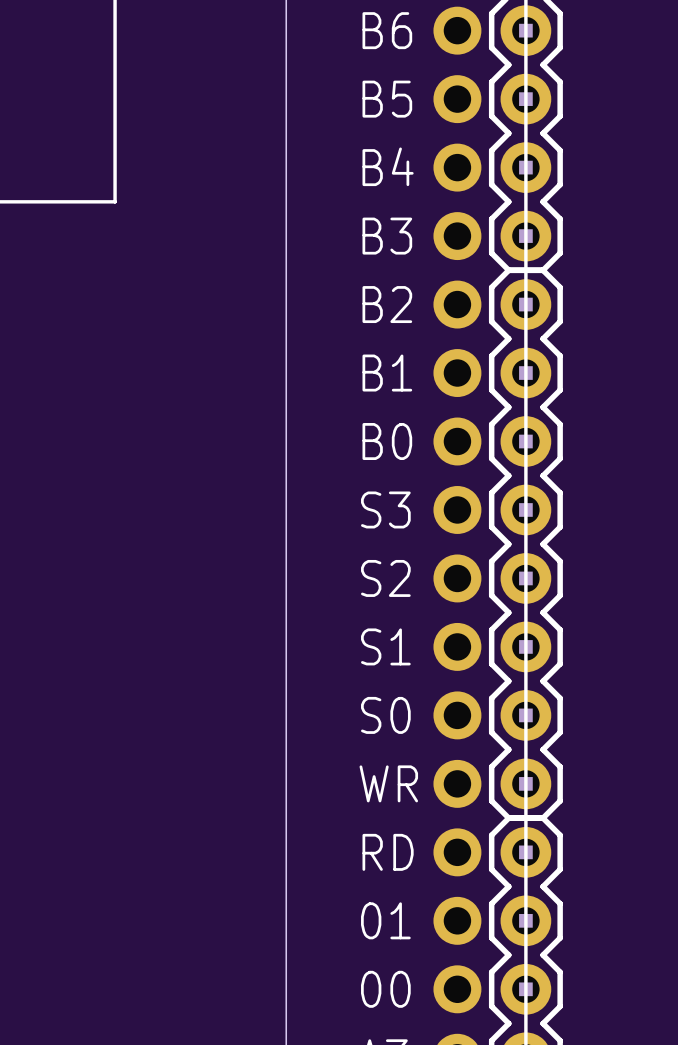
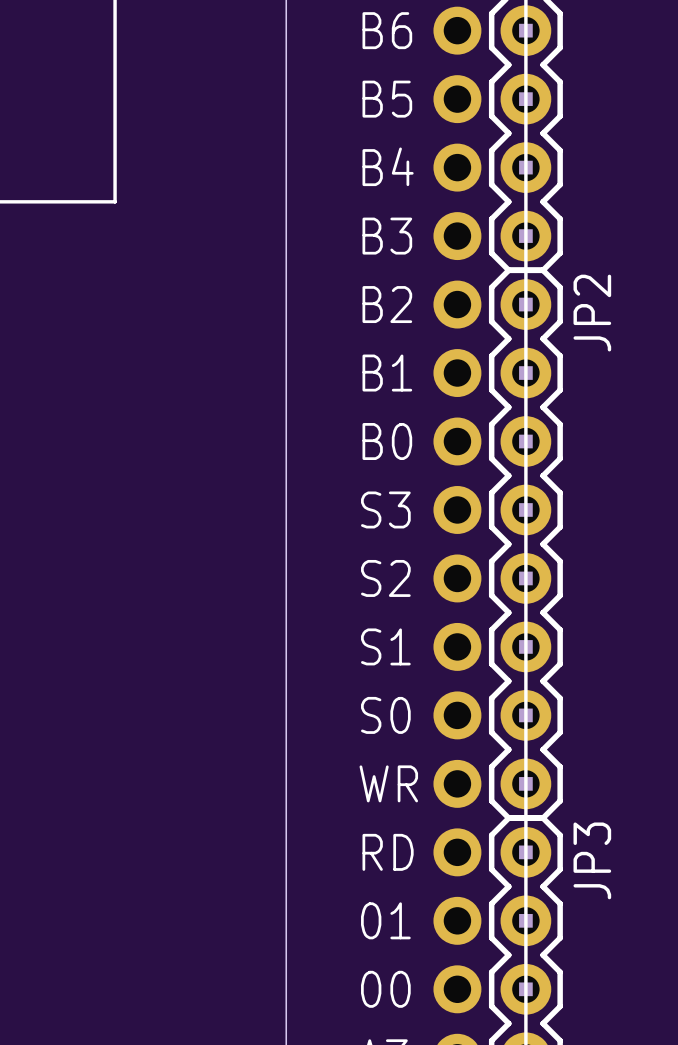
JP2 name: none -> JP2 (592, 313)
JP3 name: none -> JP3 (592, 860)

